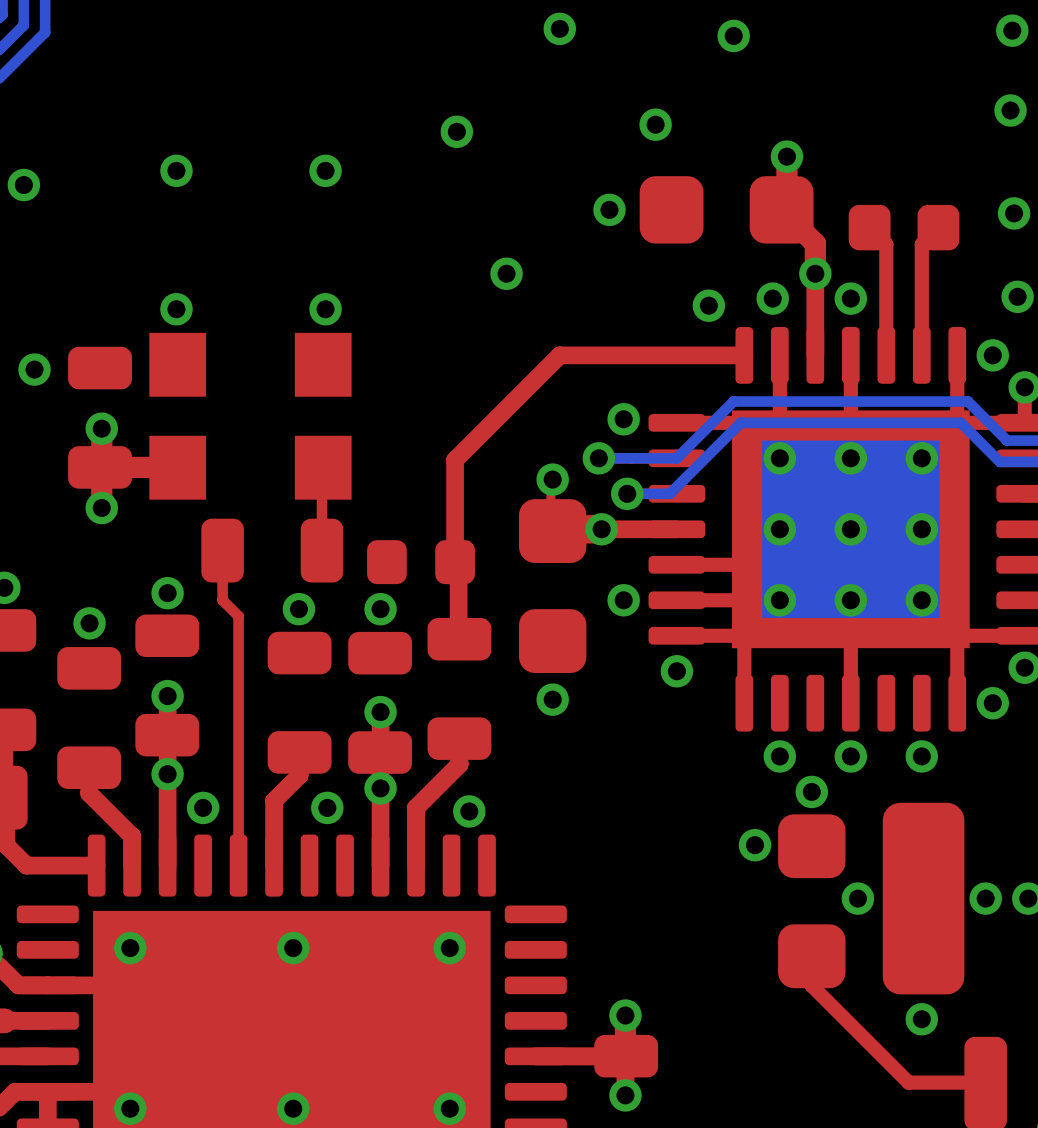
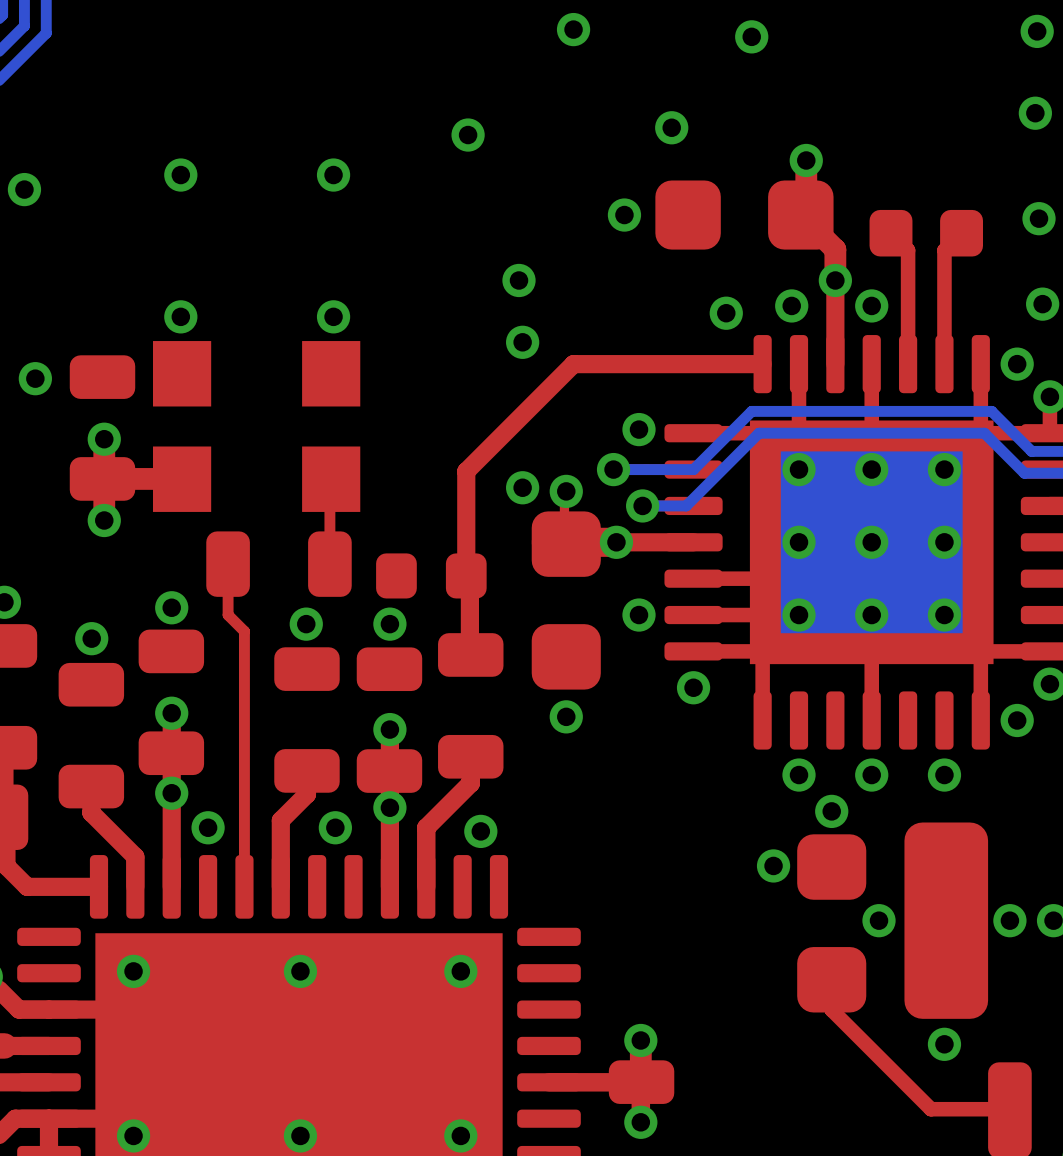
via: none -> (522, 342)
via: none -> (522, 487)

